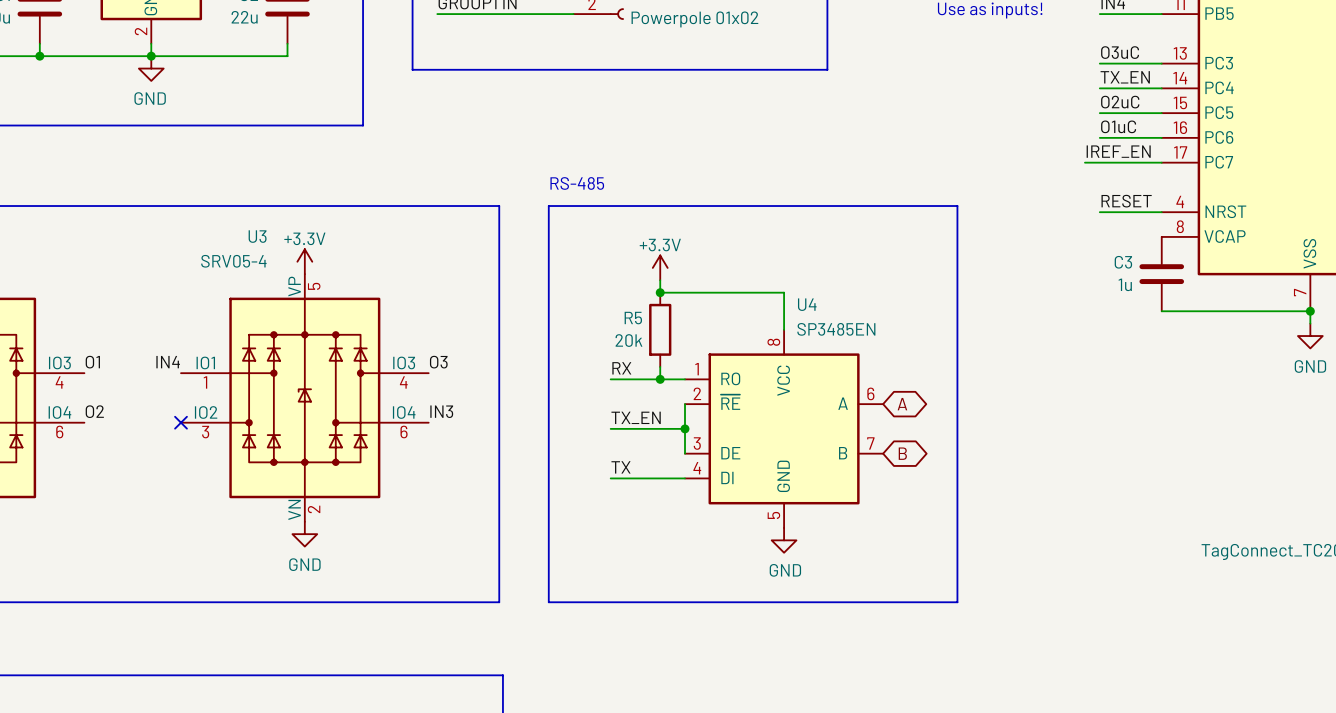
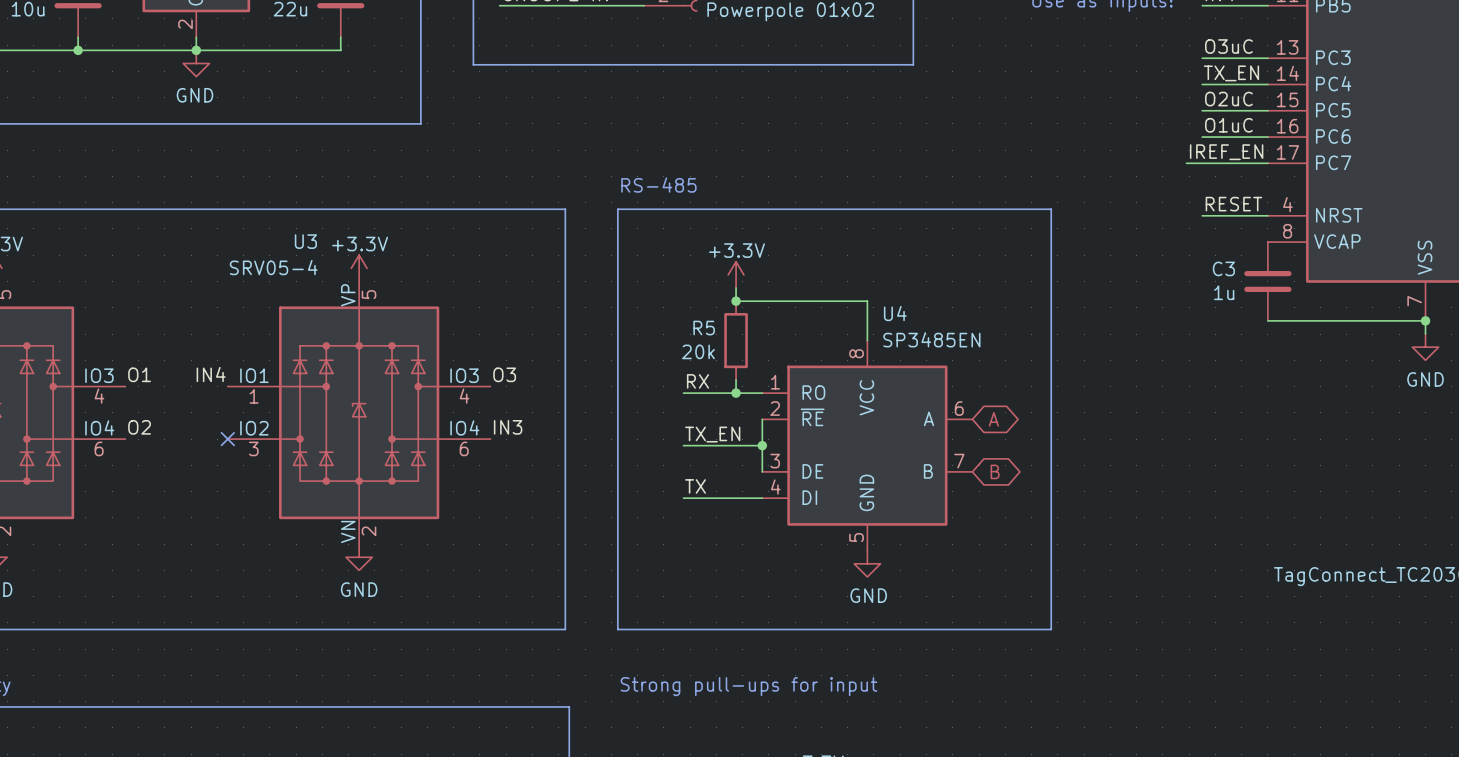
text: none -> Strong pull-ups for input (748, 686)

